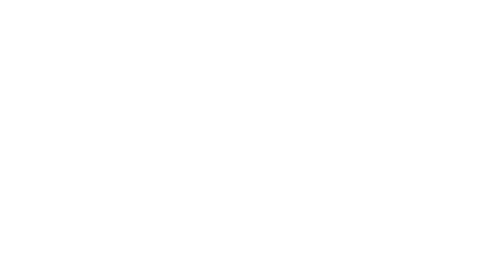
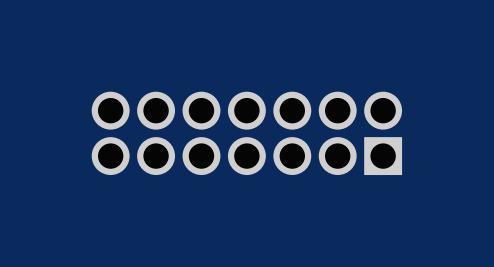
part: none -> (246, 133)

